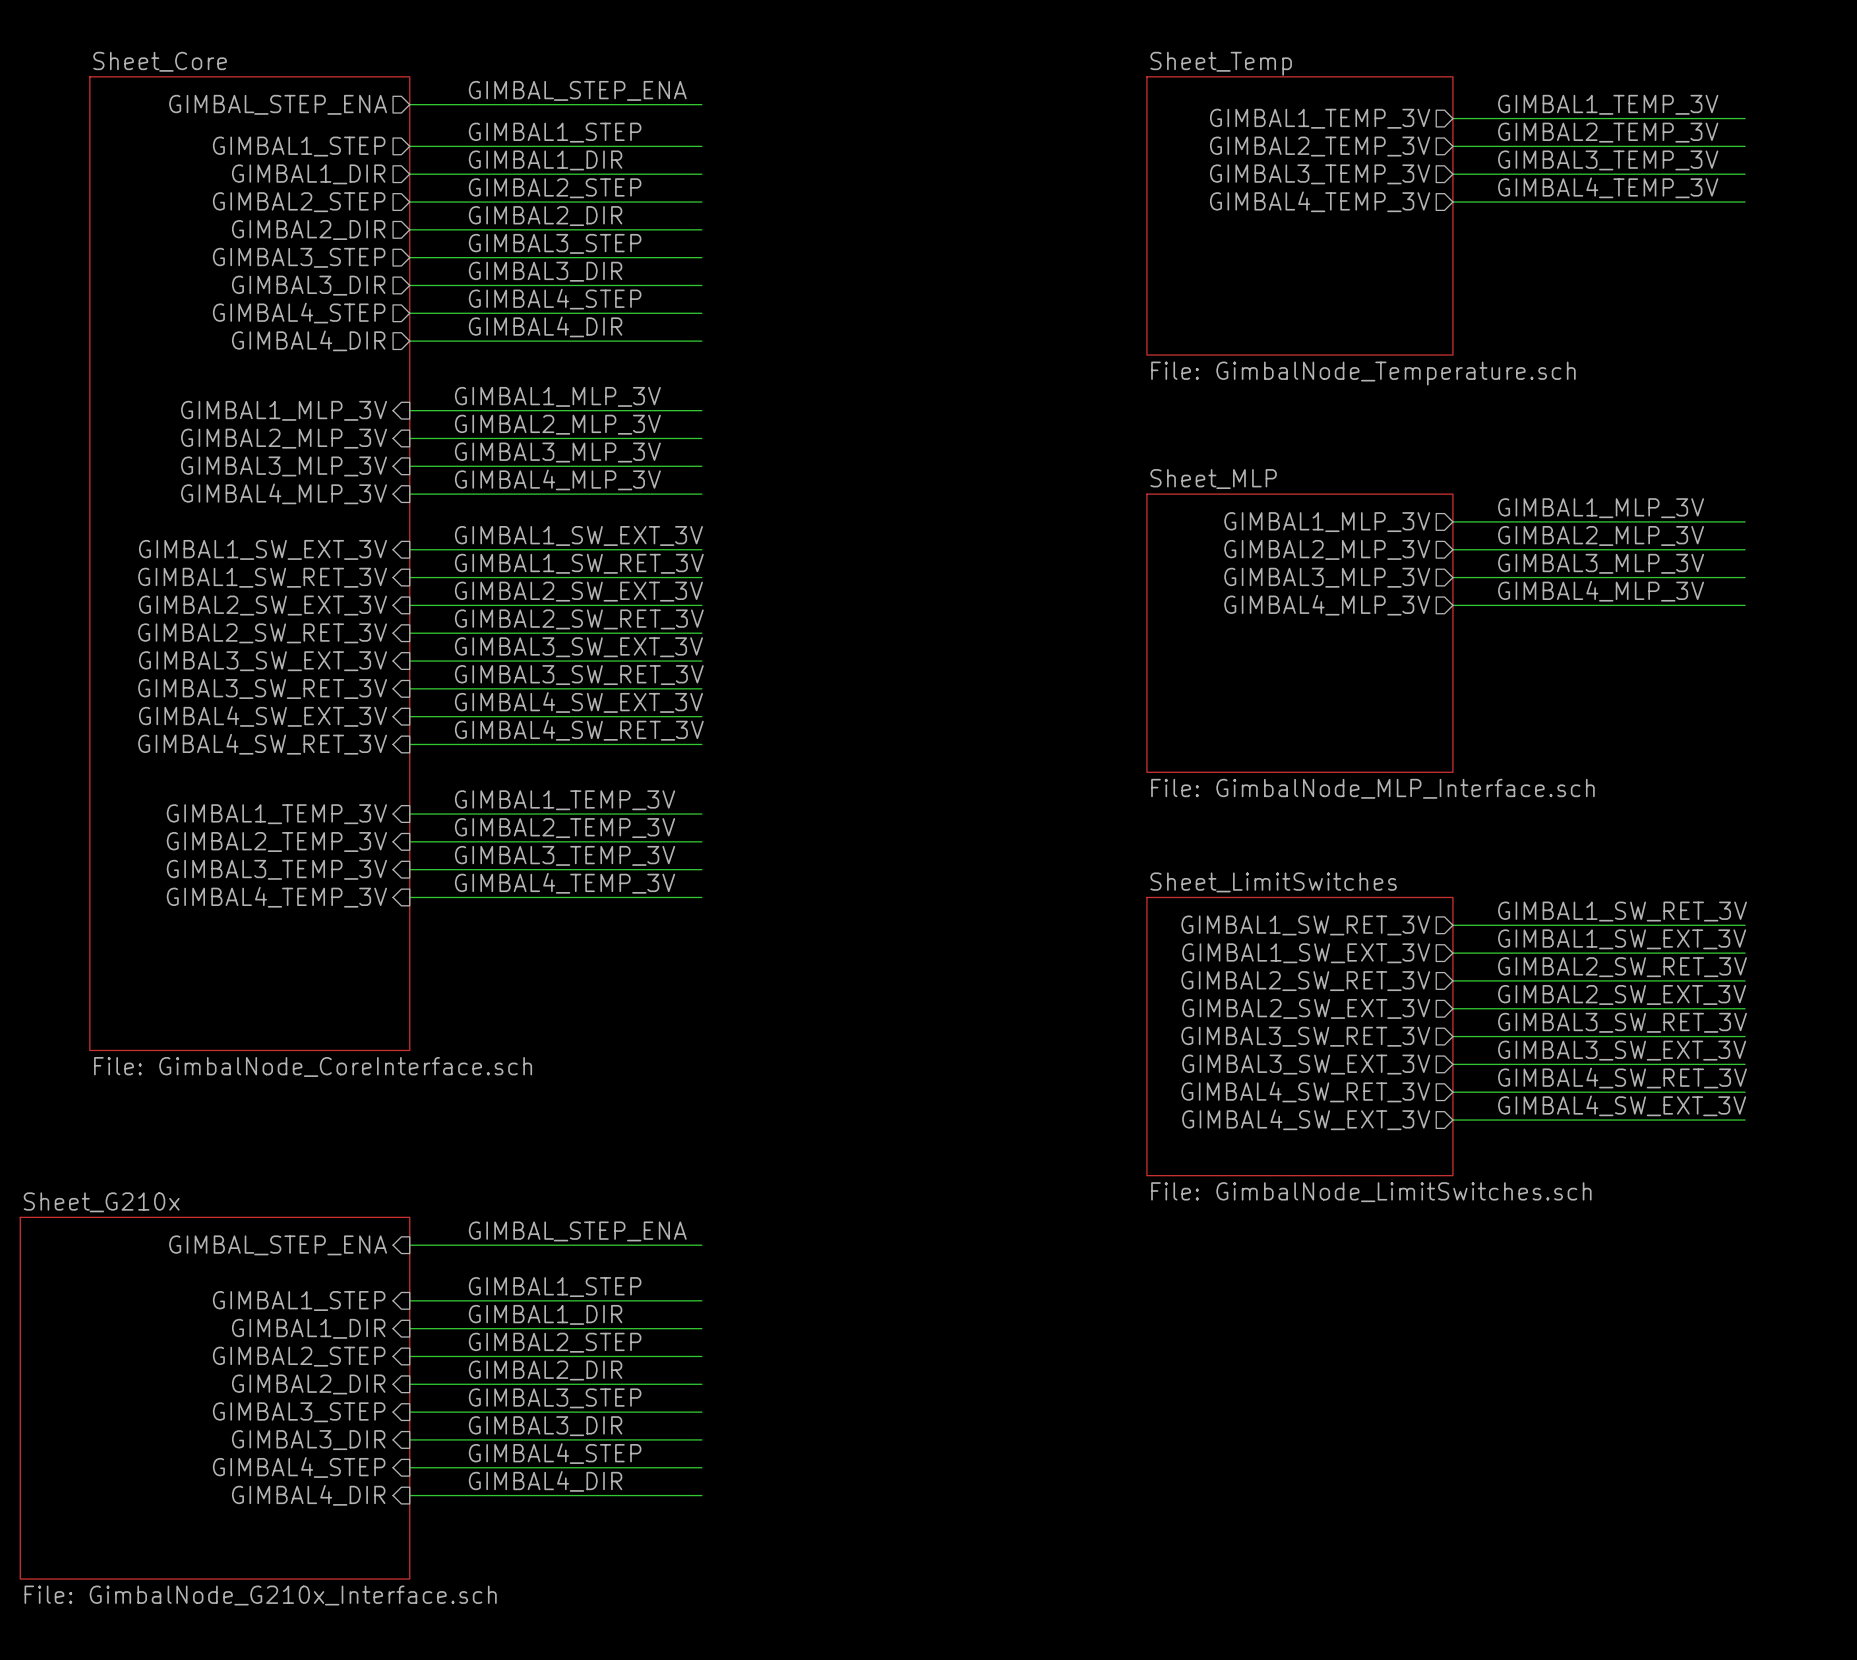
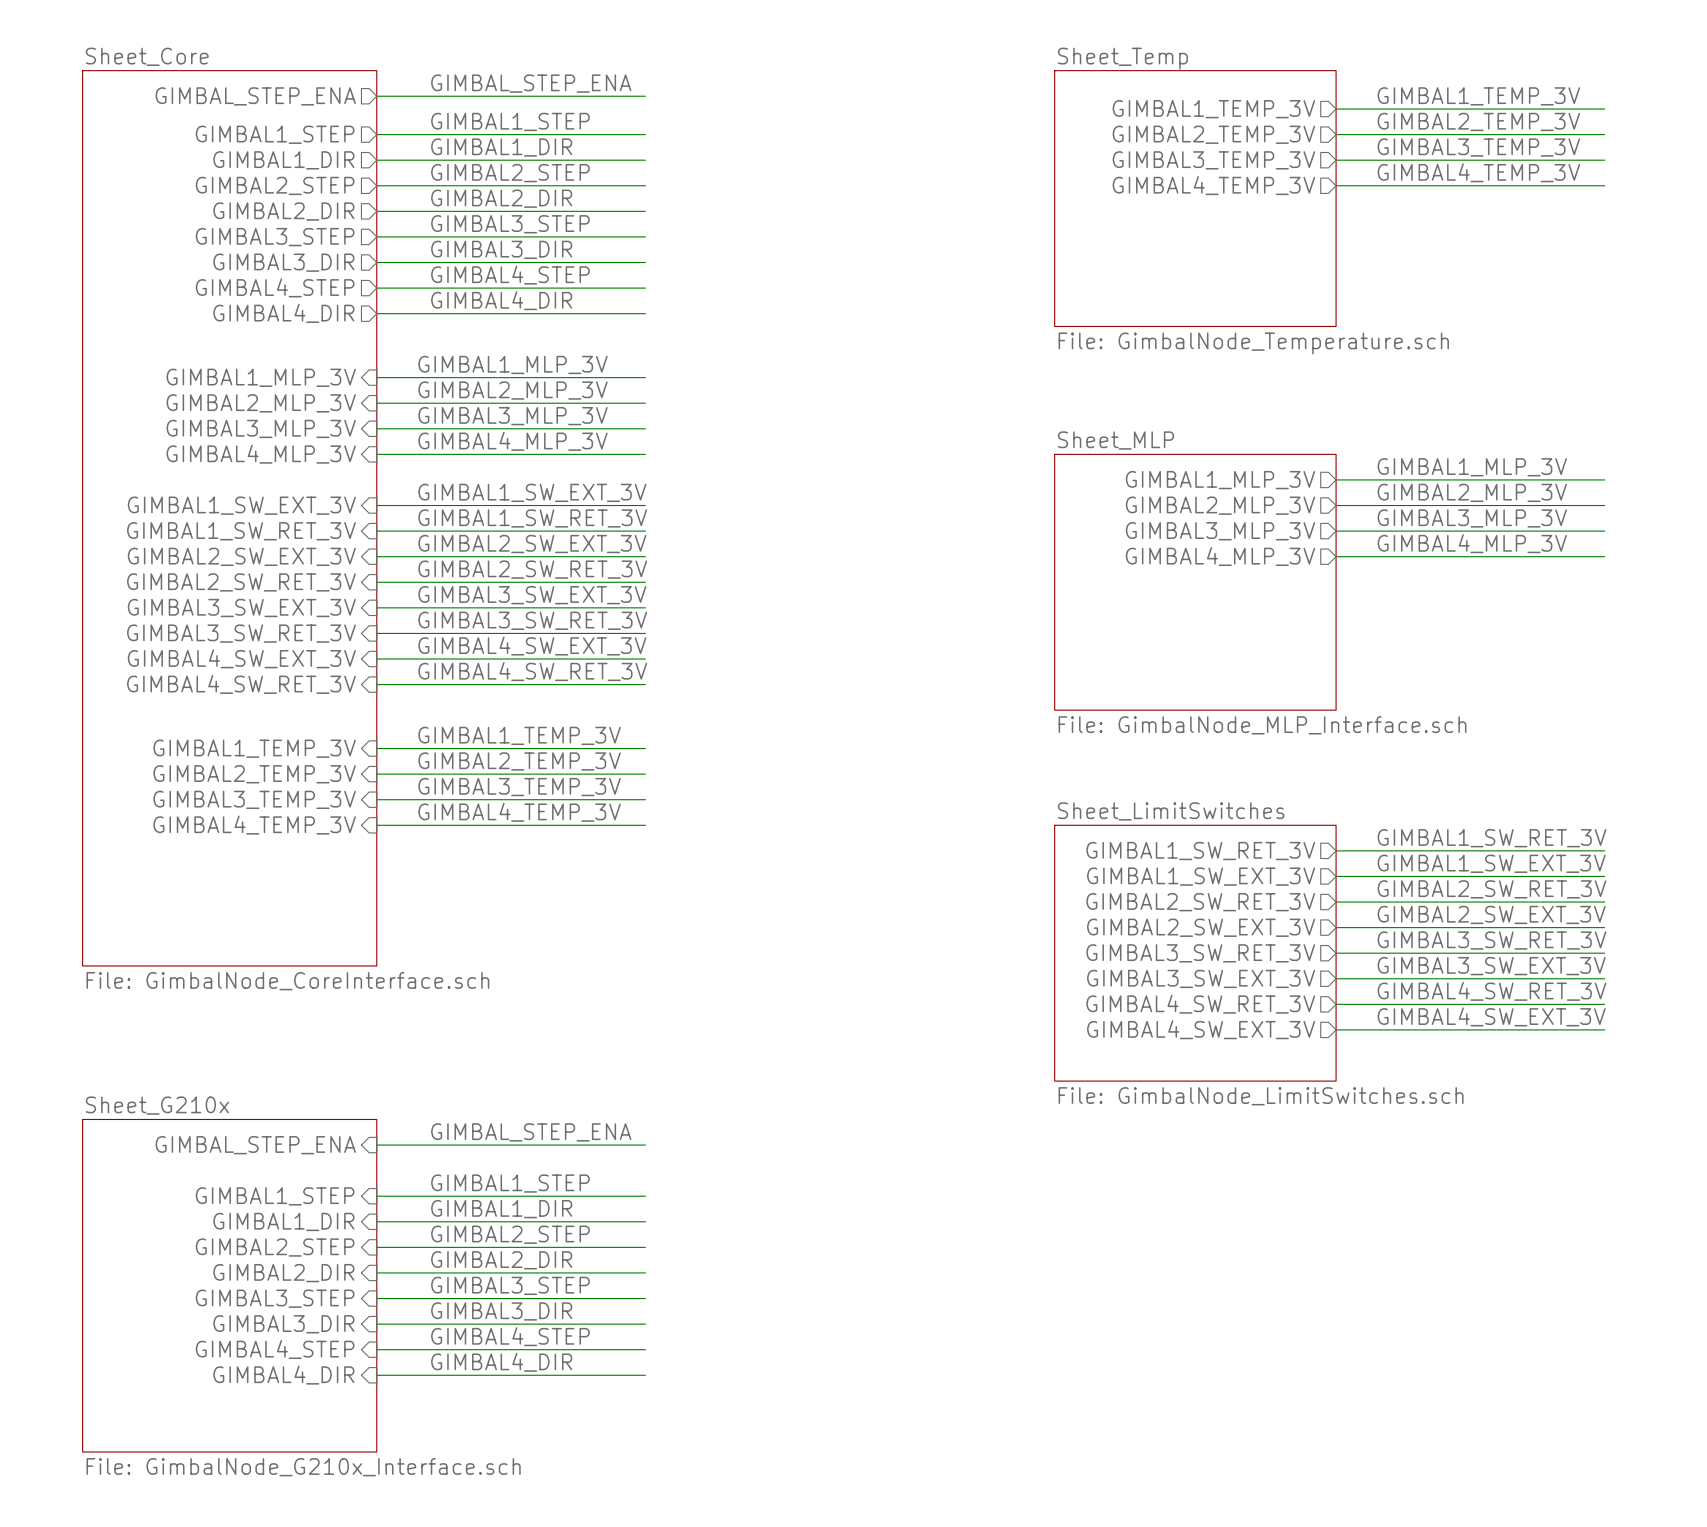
sheet Sheet_G210x name position: Sheet_G210x (101, 1202) -> Sheet_G210x (157, 1105)
sheet Sheet_G210x shape: [20, 1217, 410, 1580] -> [82, 1119, 377, 1453]
sheet Sheet_G210x value position: File: GimbalNode_G210x_Interface.sch (260, 1595) -> File: GimbalNode_G210x_Interface.sch (303, 1467)

